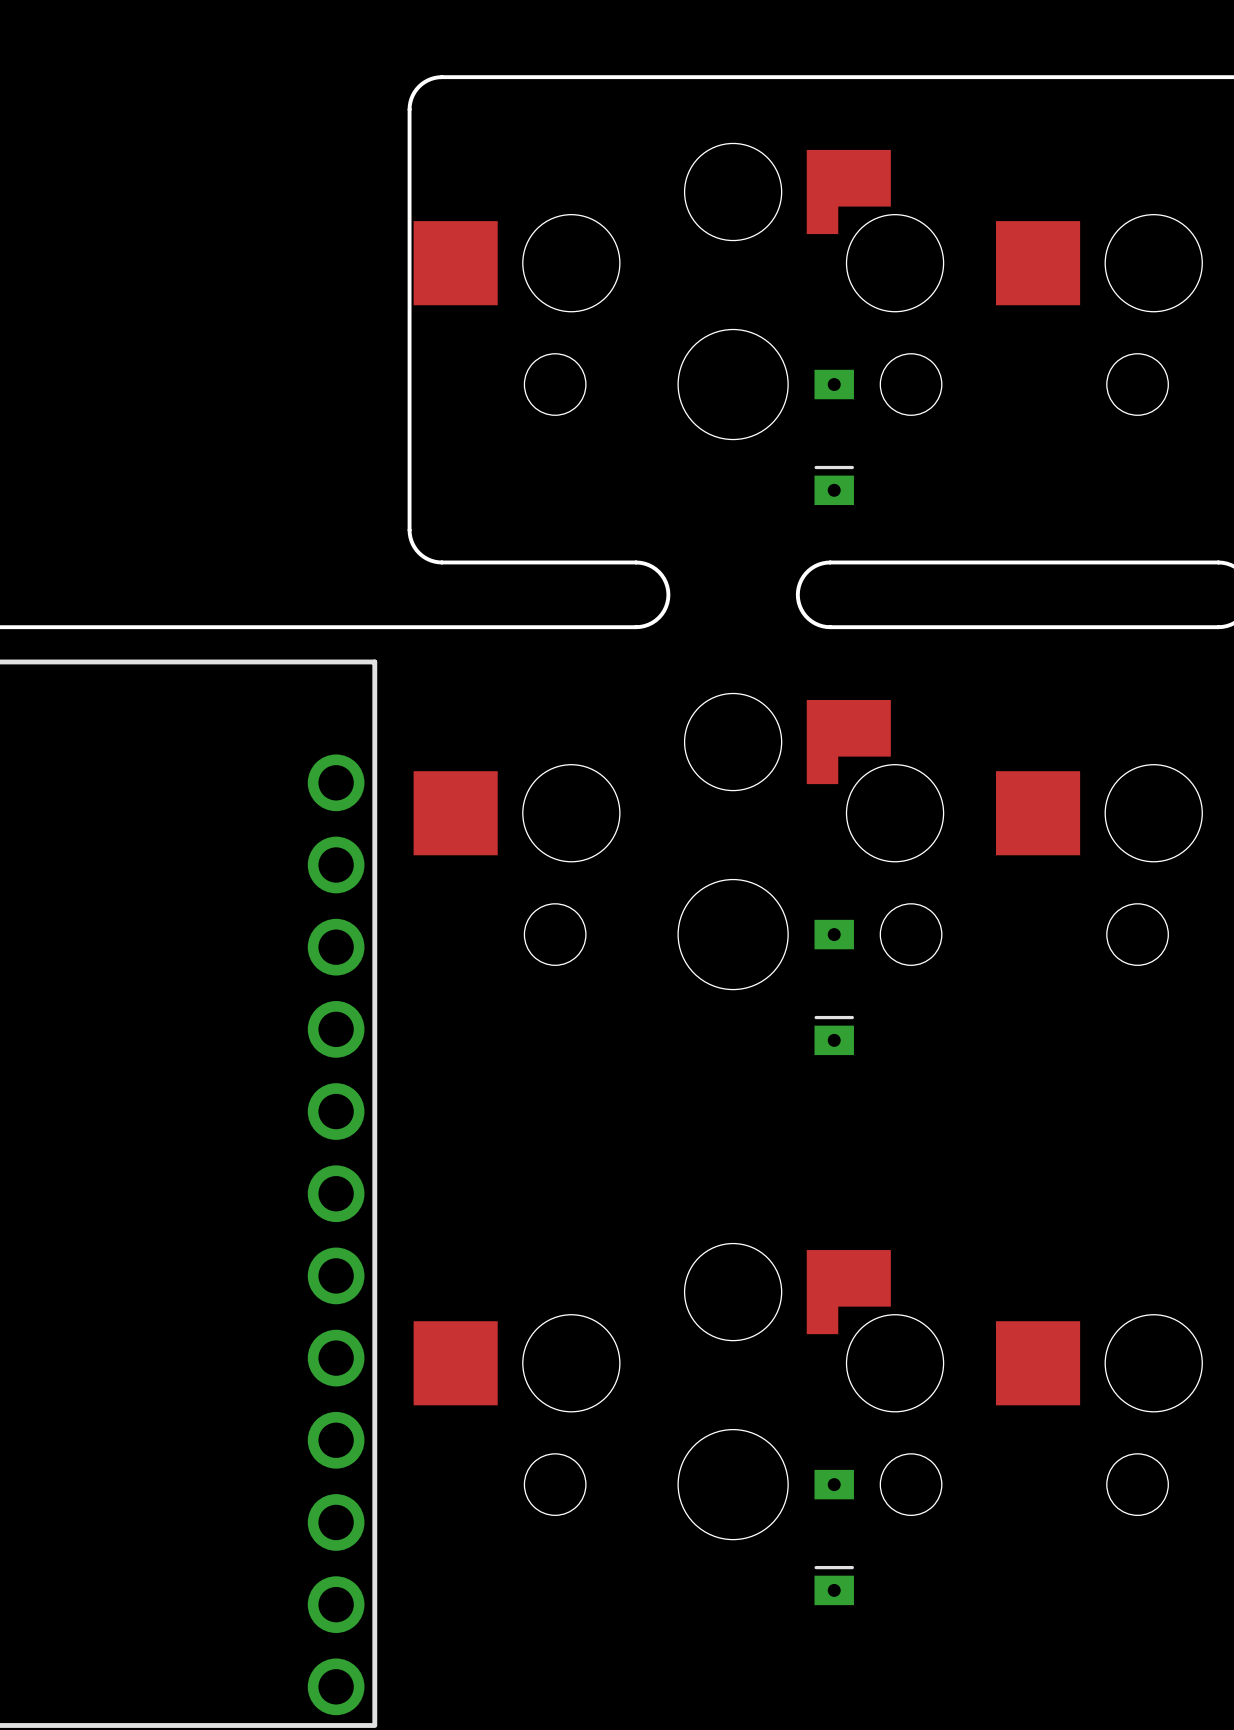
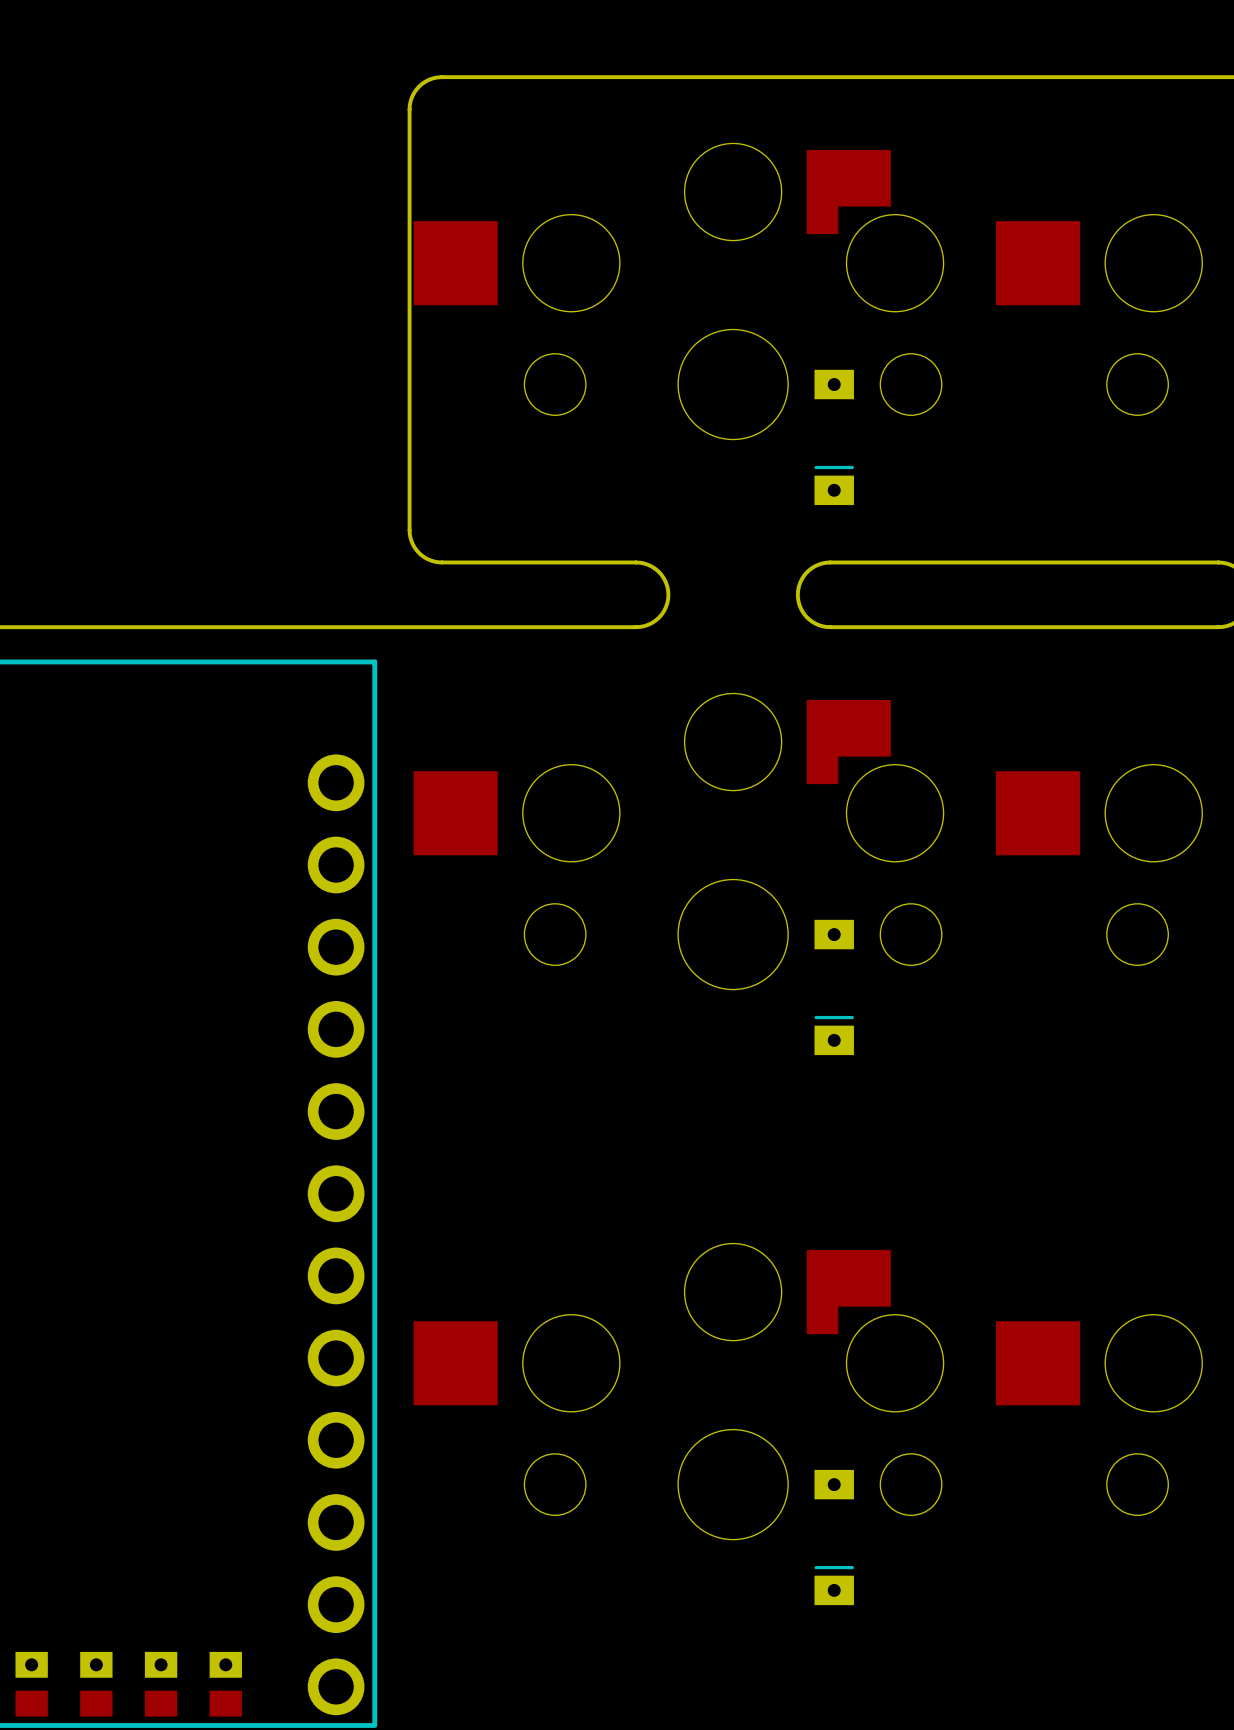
part: none -> (31, 1684)
part: none -> (96, 1684)
part: none -> (161, 1684)
part: none -> (225, 1684)

